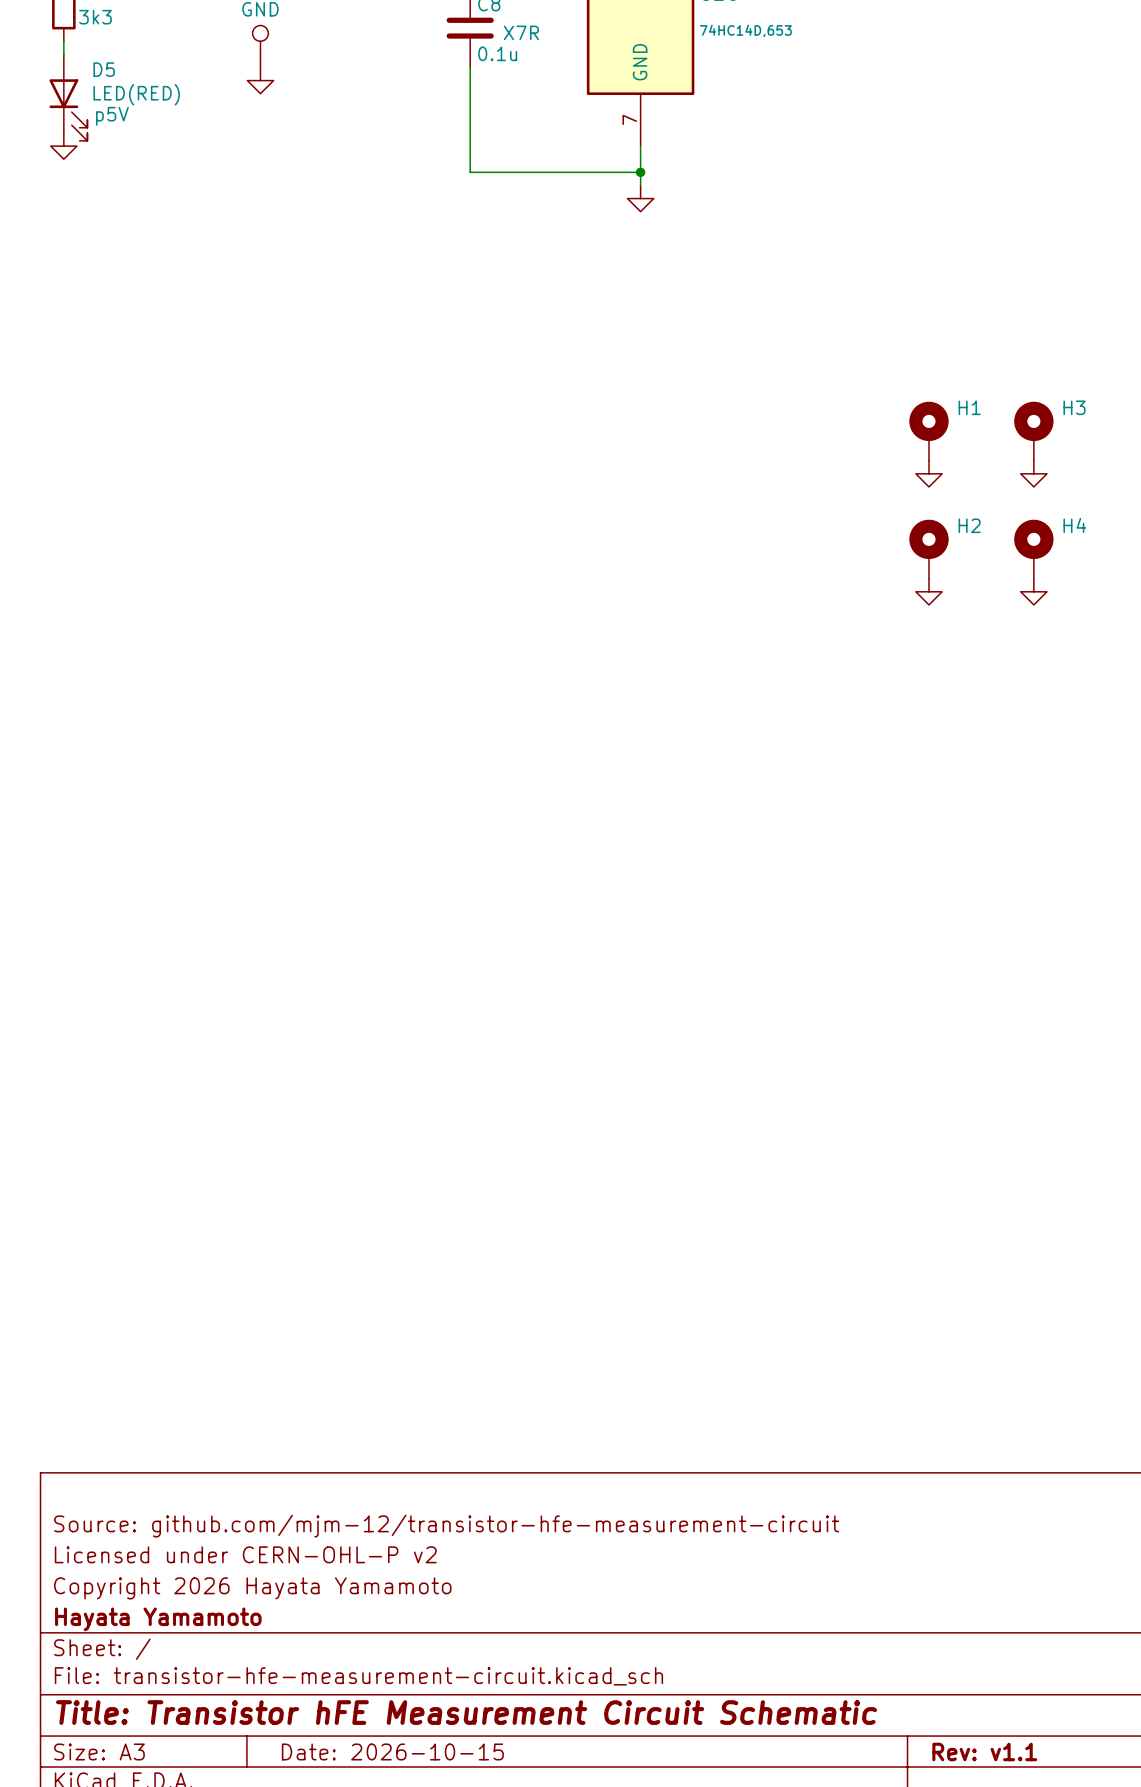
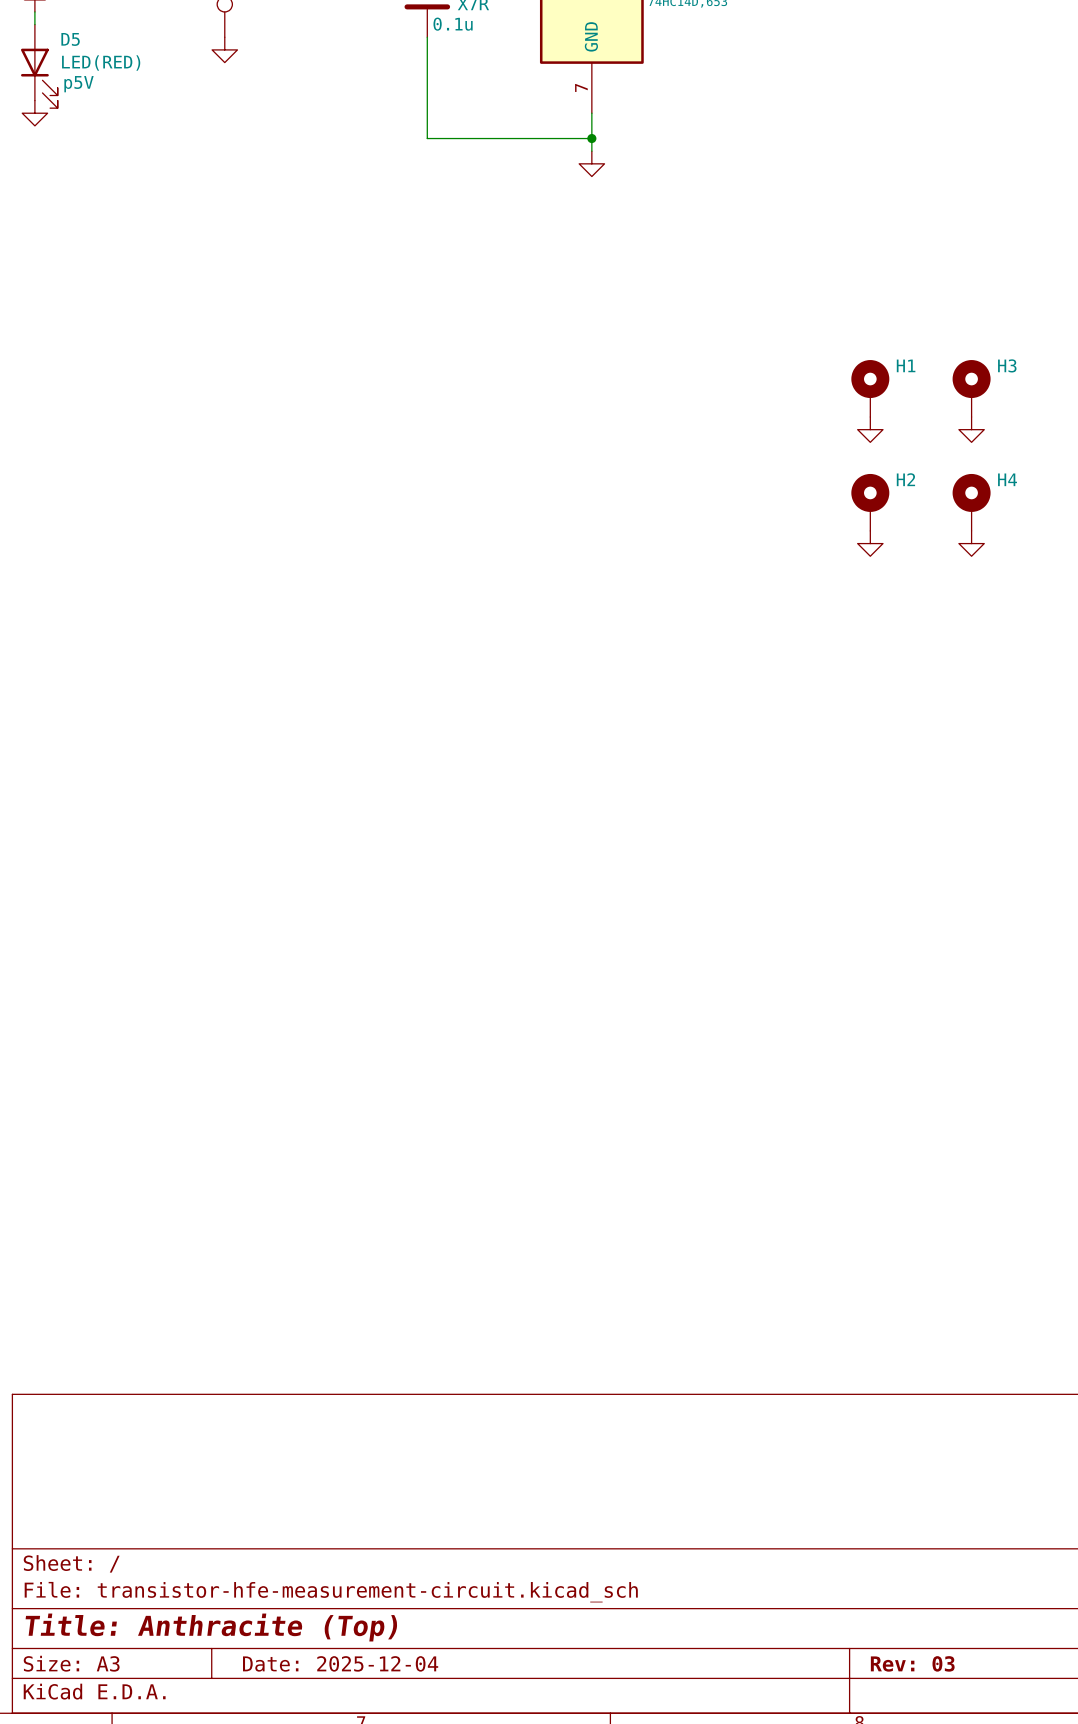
title block: Source: github.com/mjm-12/transistor-hfe-measurement-circuit (446, 1526) -> none
title block: Licensed under CERN-OHL-P v2 (245, 1554) -> none
title block: Copyright 2026 Hayata Yamamoto (252, 1588) -> none
title block: Hayata Yamamoto (158, 1619) -> none
title block: Title: Transistor hFE Measurement Circuit Schematic (466, 1712) -> Title: Anthracite (Top) (211, 1627)
title block: Date: 2026-10-15 (392, 1751) -> Date: 2025-12-04 (340, 1663)
title block: Rev: v1.1 (984, 1751) -> Rev: 03 (912, 1663)

